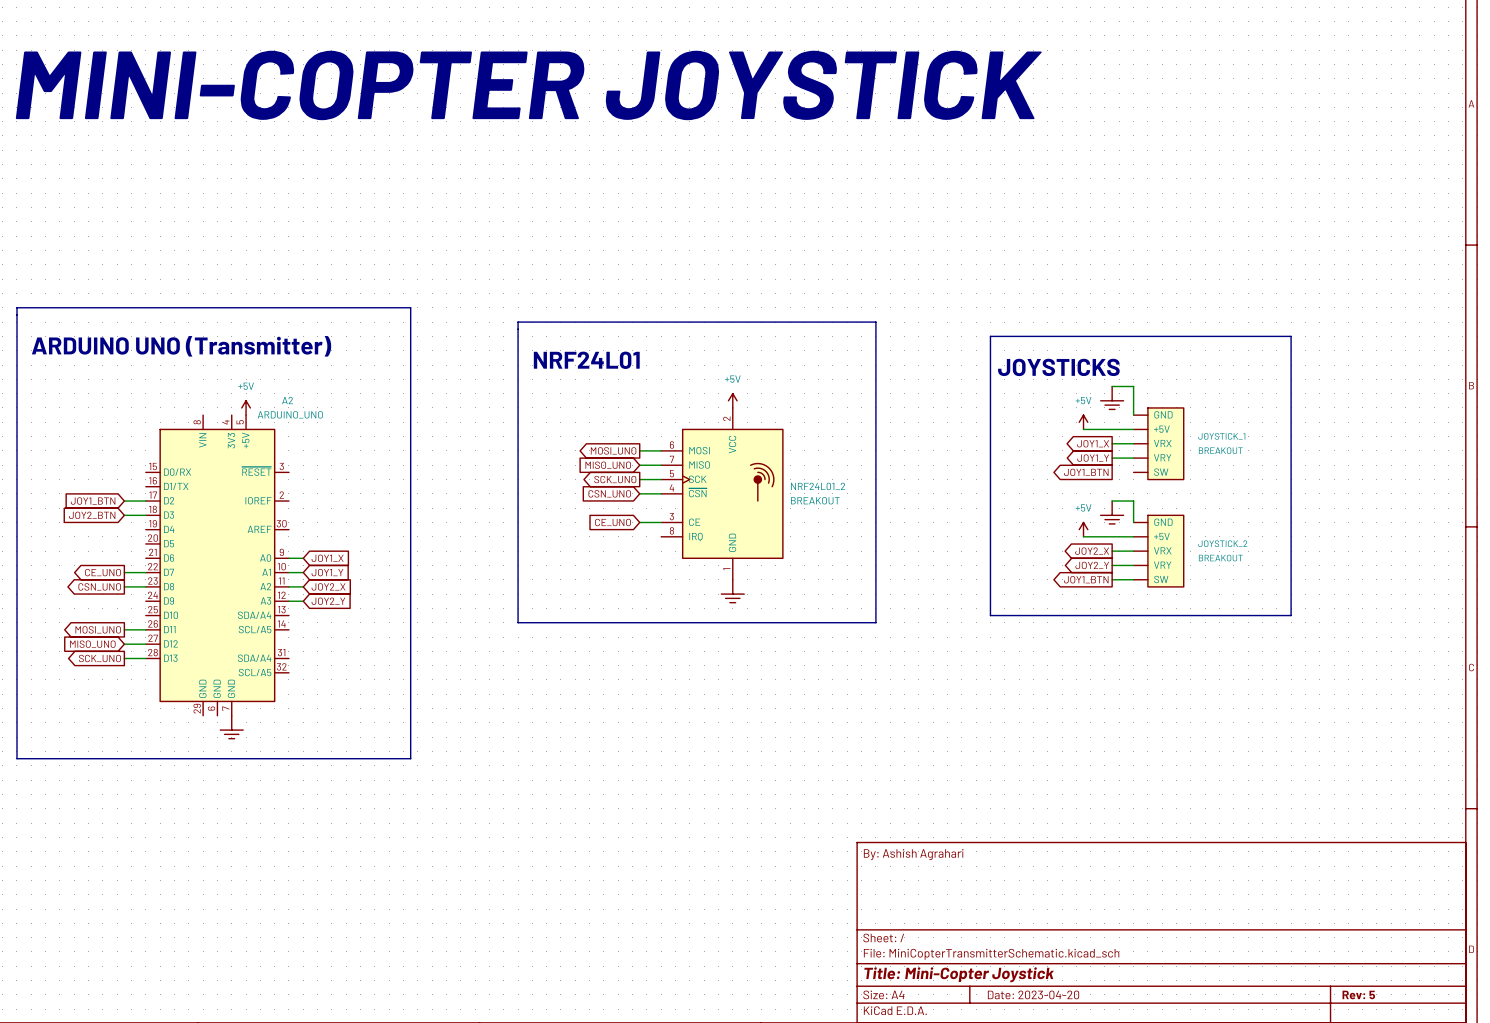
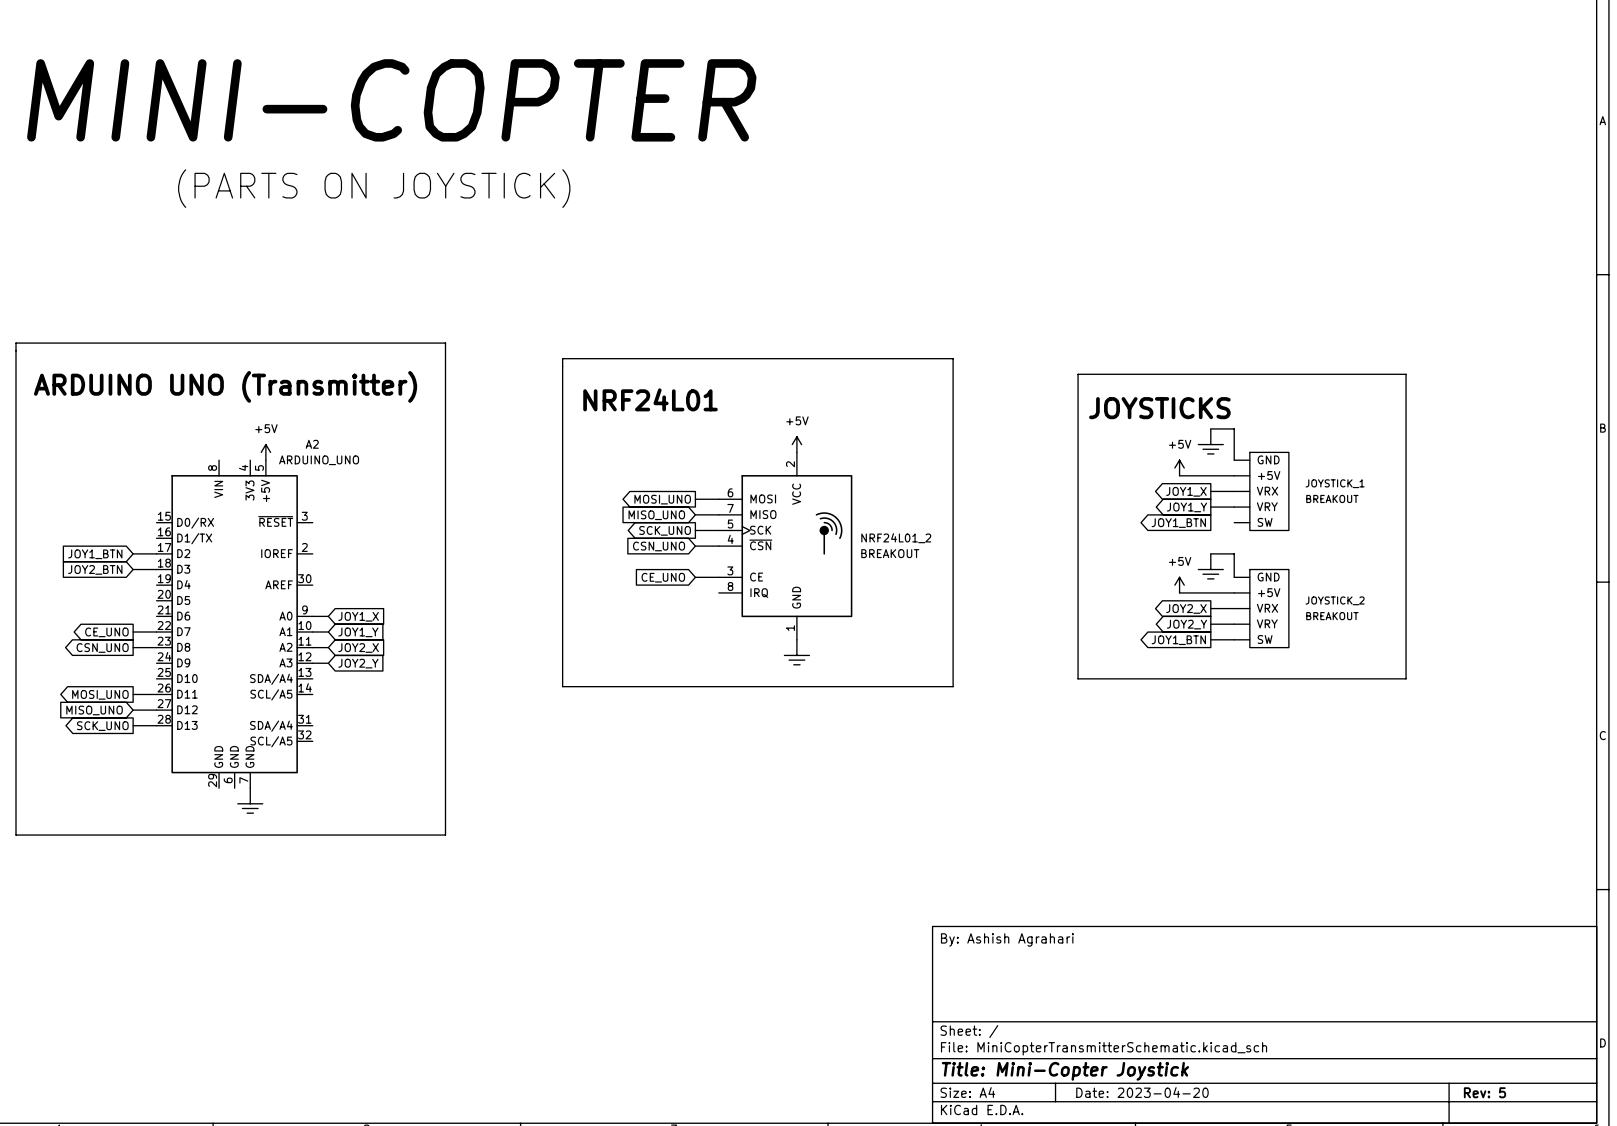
text: MINI-COPTER JOYSTICK (528, 85) -> MINI-COPTER (391, 100)
text: none -> (PARTS ON JOYSTICK) (374, 188)

